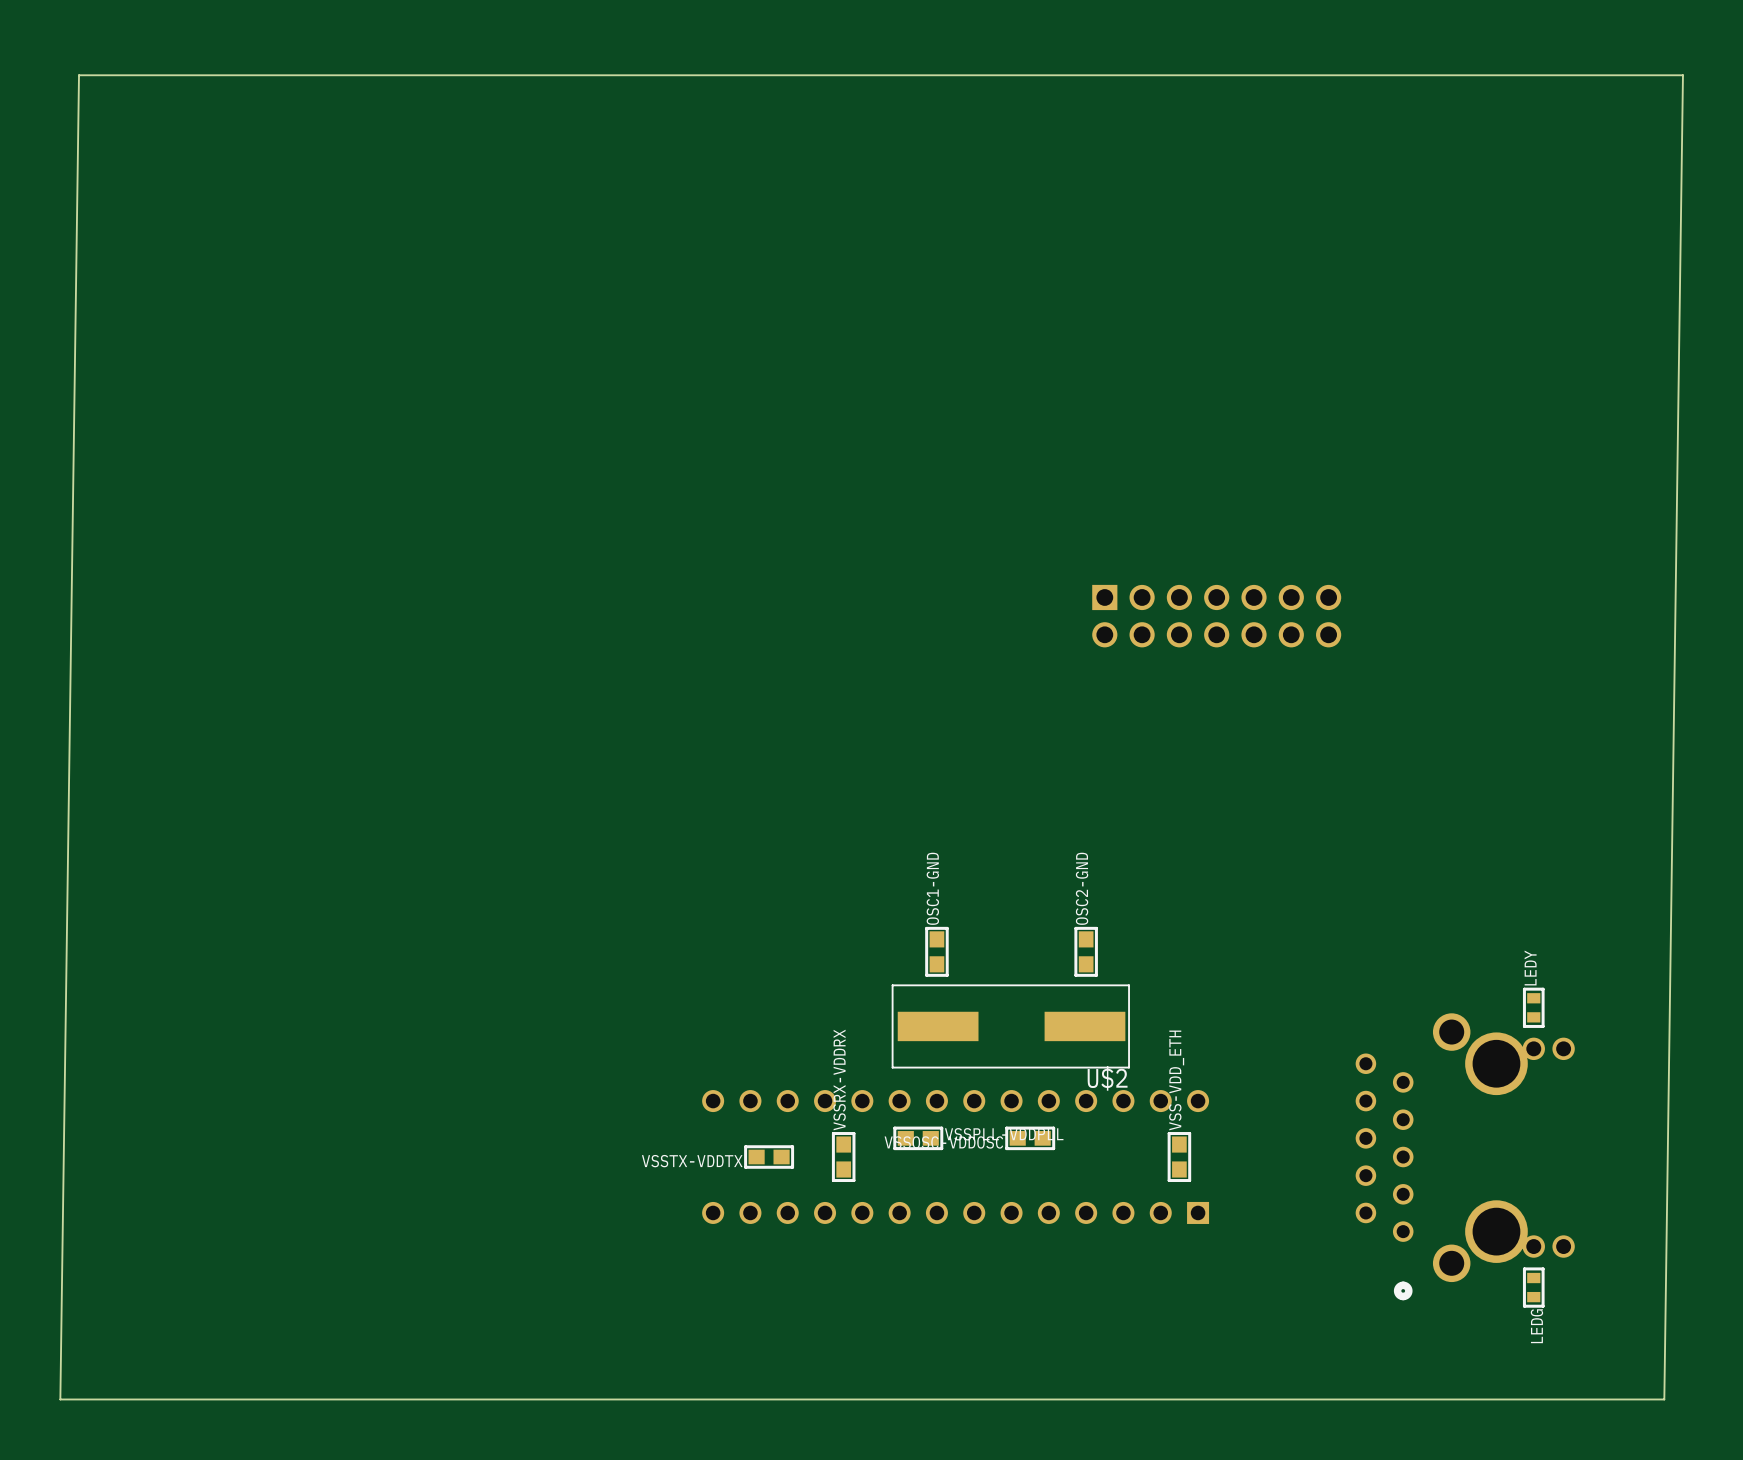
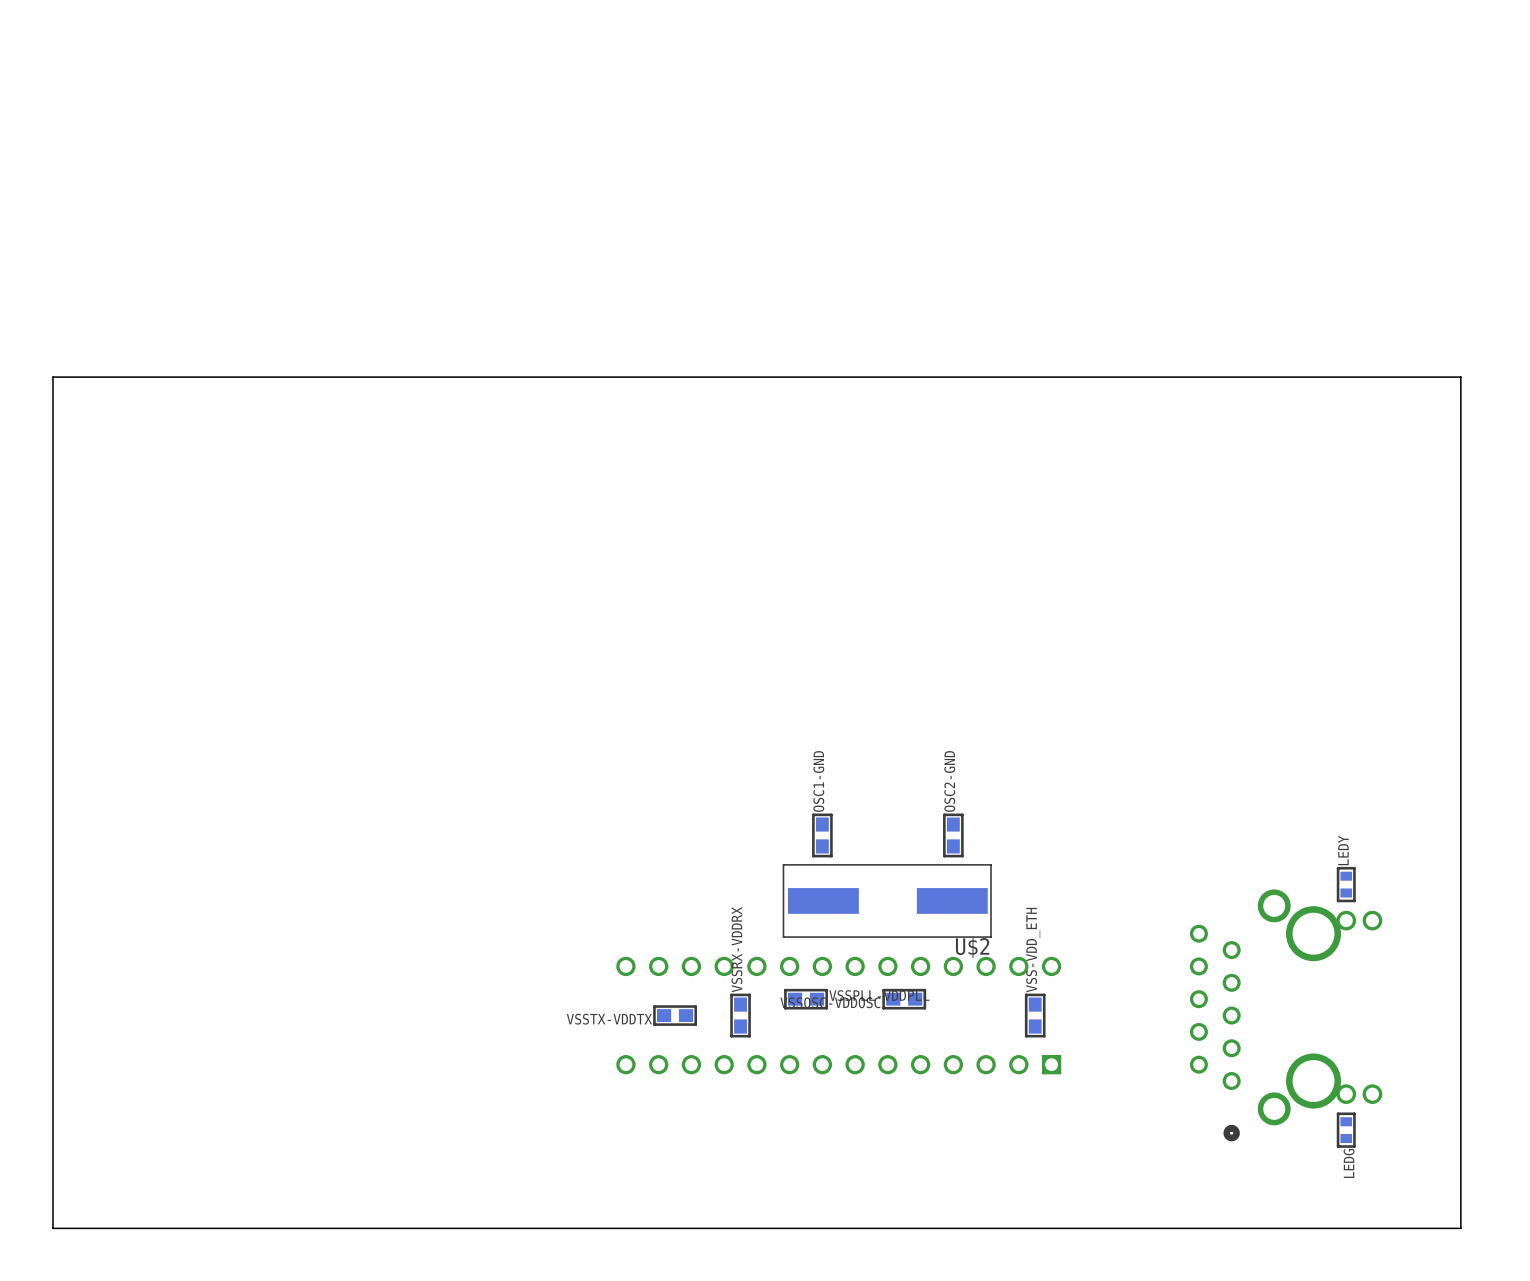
part: (1216, 616) -> none
board edge: (1664, 1399) (1682, 75) (79, 75) (60, 1399) -> (1460, 1228) (1460, 377) (52, 377) (52, 1228)

